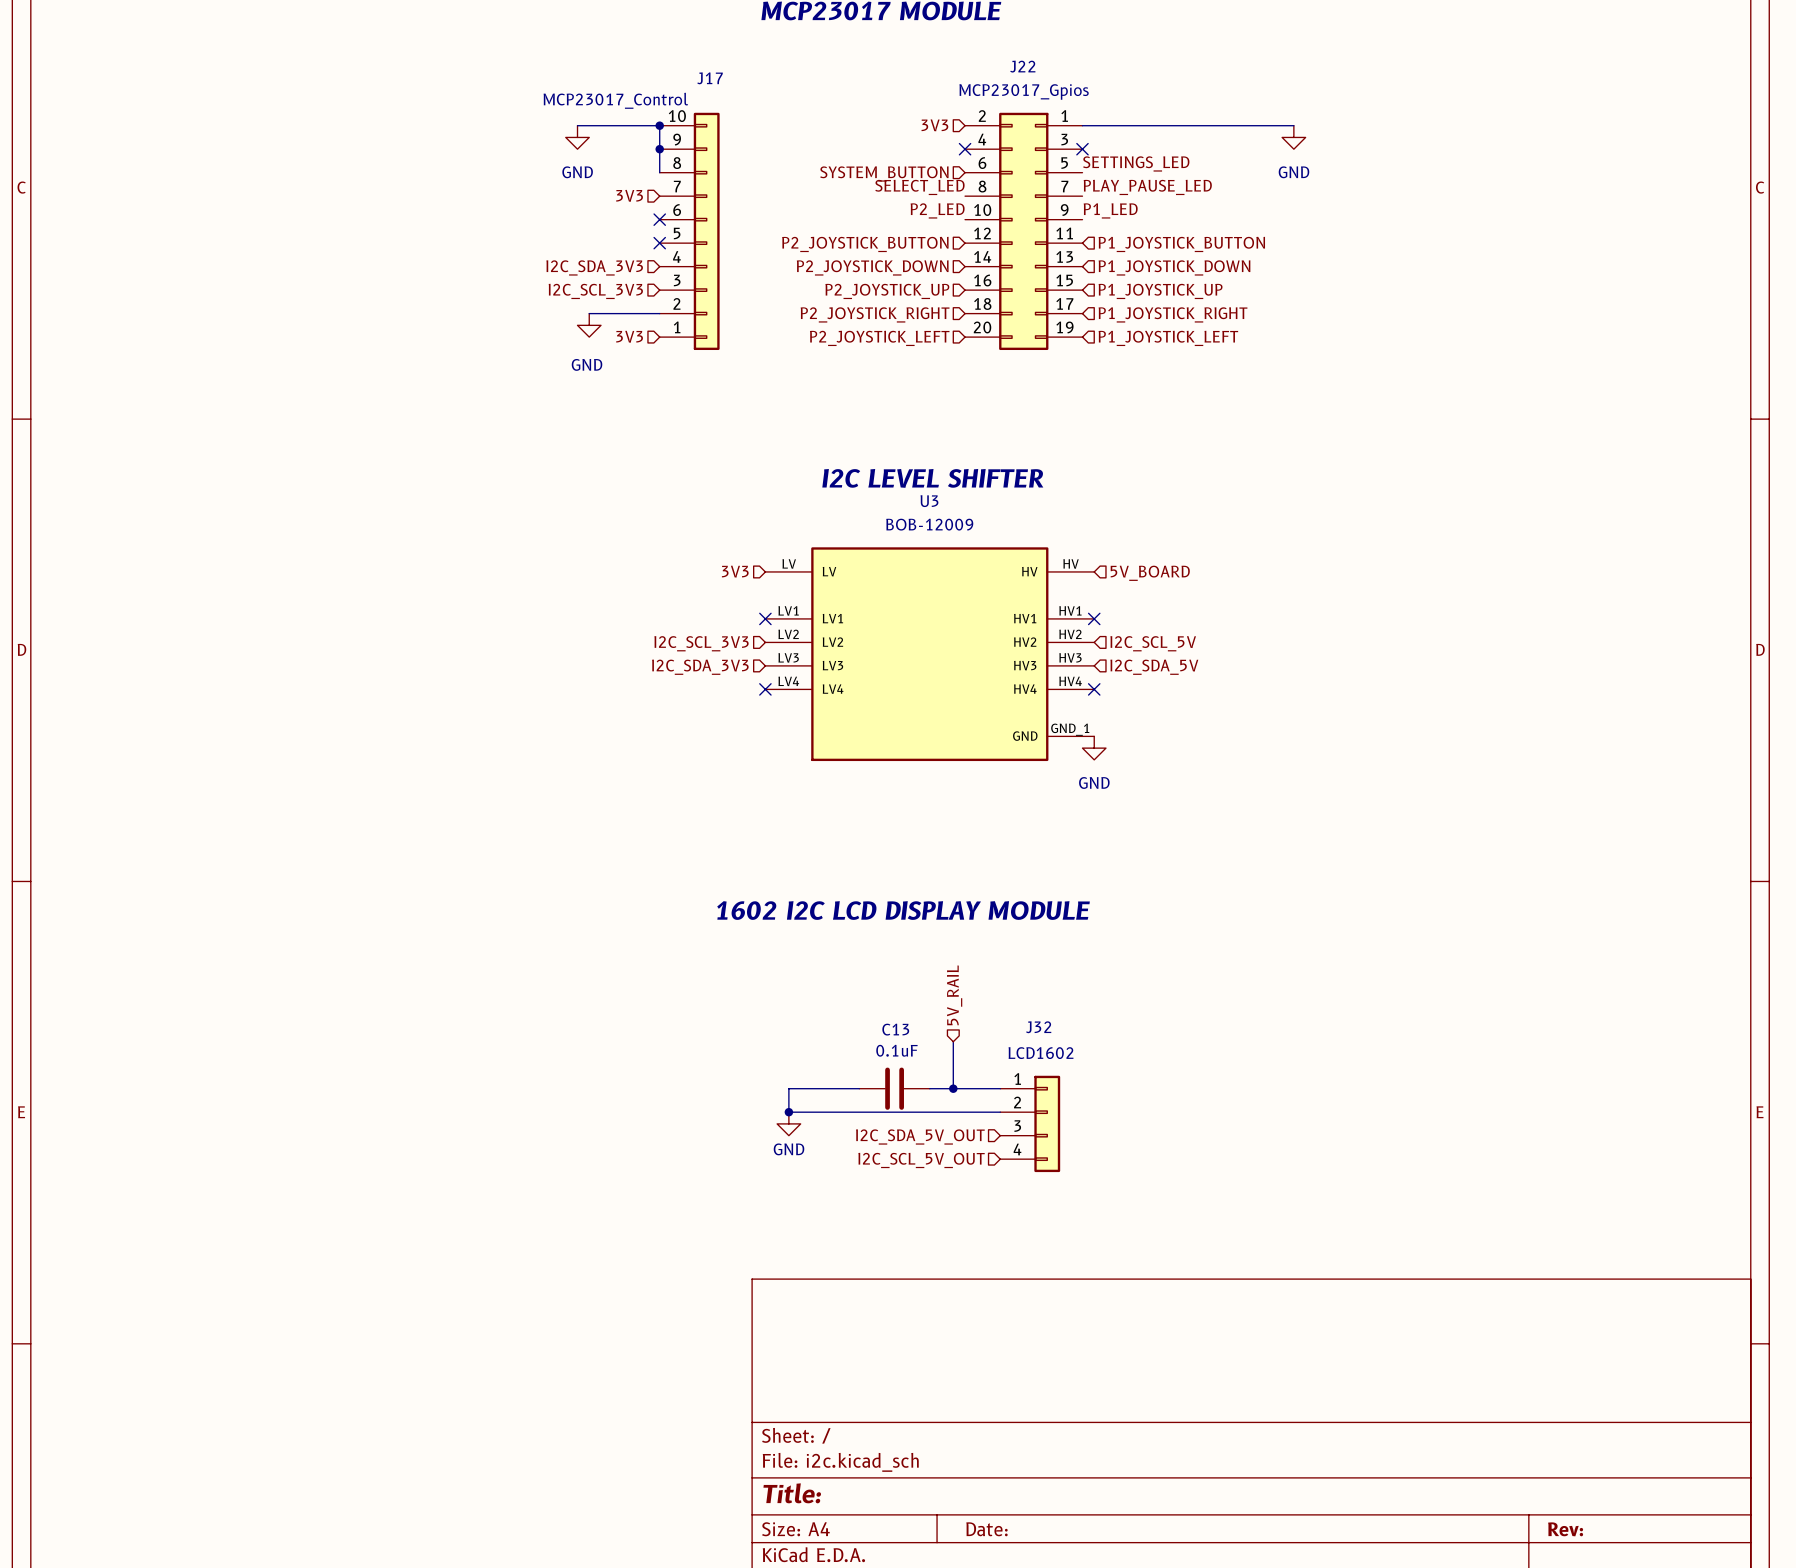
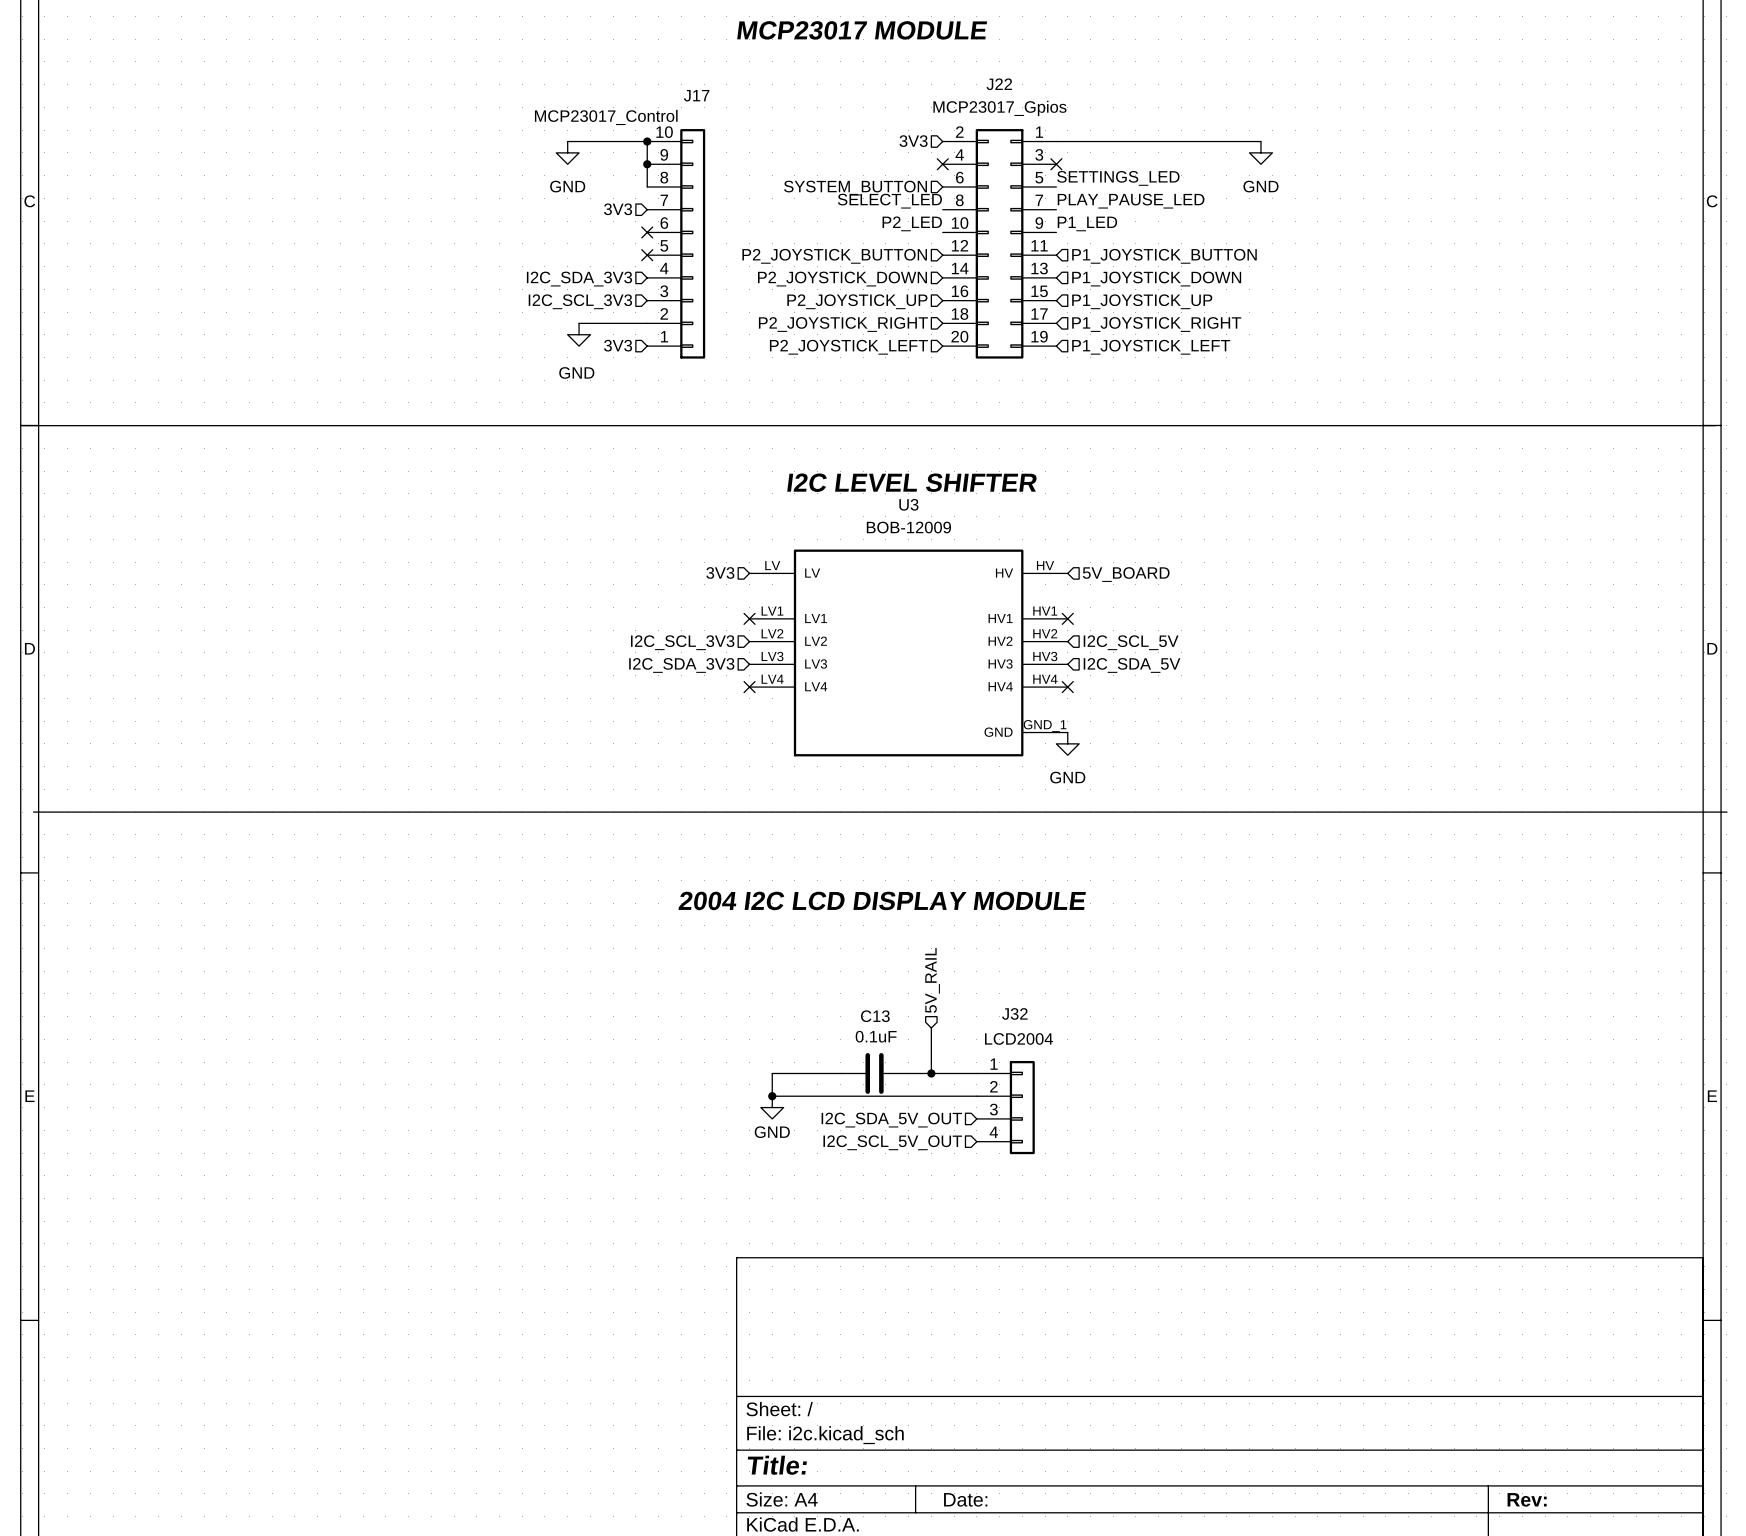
line: none -> (22, 425) (1715, 425)
line: none -> (33, 812) (1726, 812)
text: 1602 I2C LCD DISPLAY MODULE (903, 910) -> 2004 I2C LCD DISPLAY MODULE (882, 900)
J32 value: LCD1602 (1041, 1053) -> LCD2004 (1018, 1038)

